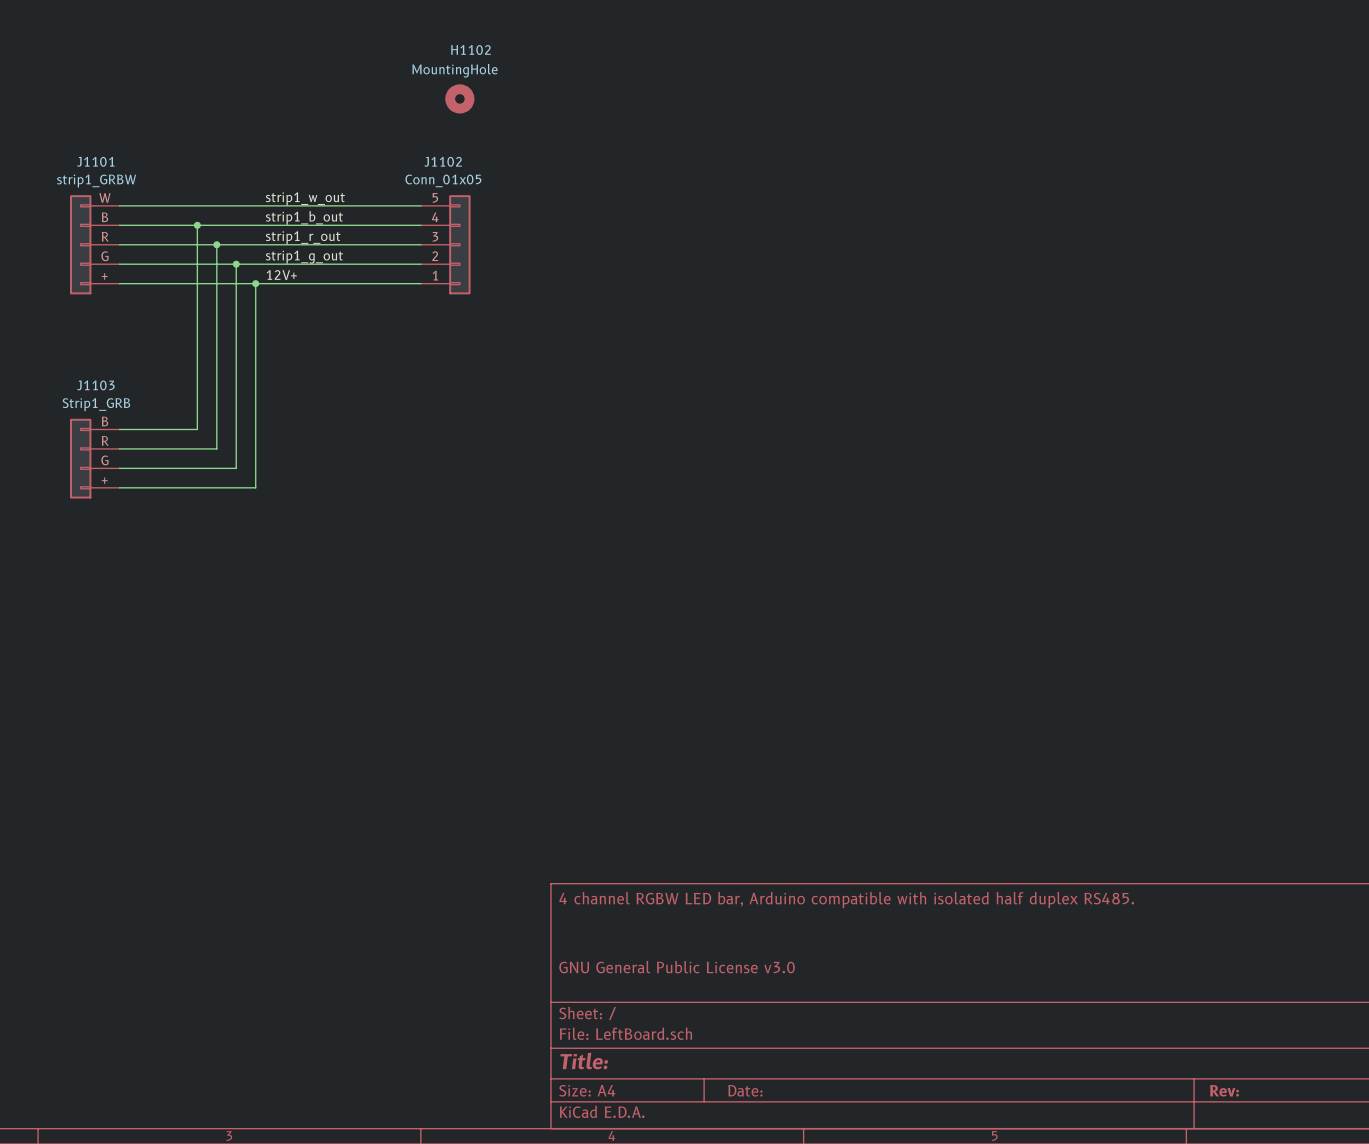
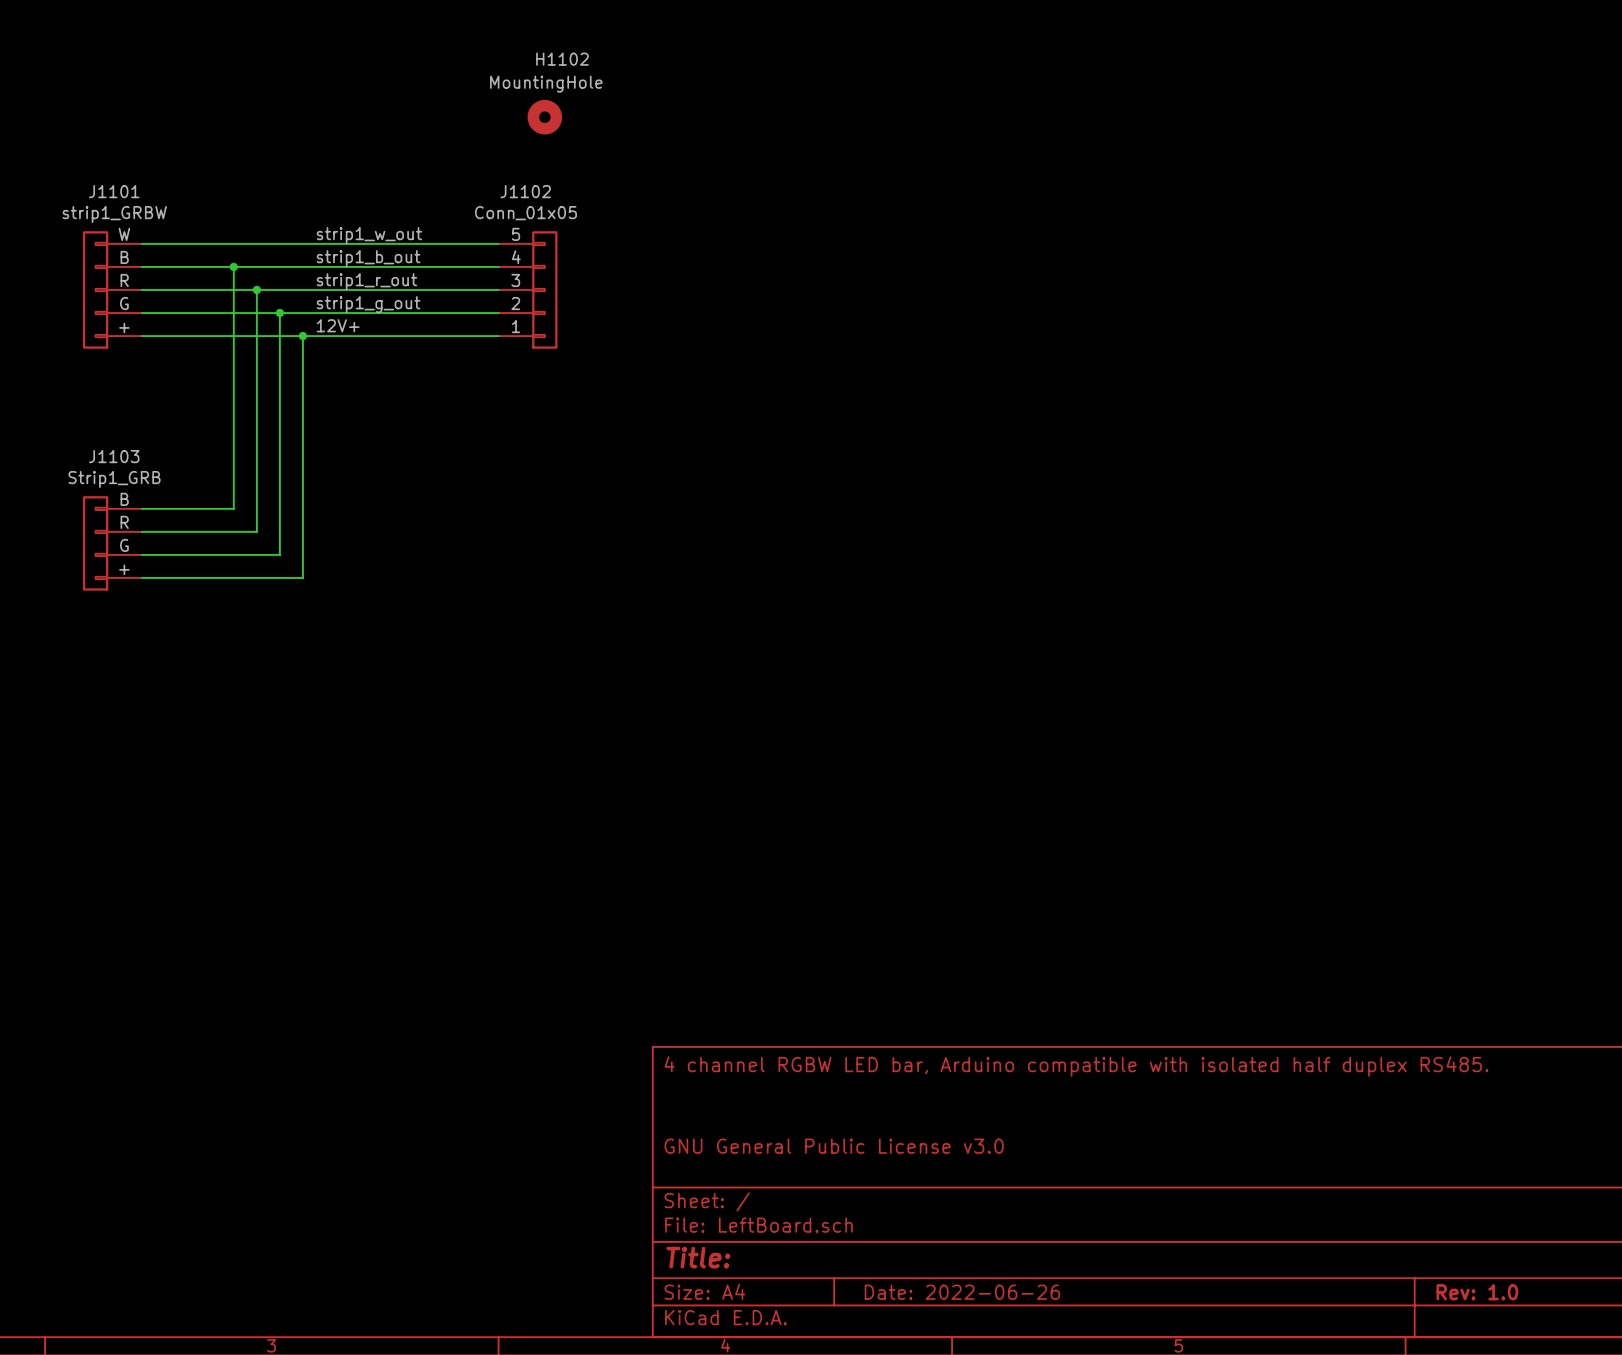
title block: Date: (745, 1090) -> Date: 2022-06-26 (962, 1292)
title block: Rev: (1224, 1090) -> Rev: 1.0 (1477, 1292)

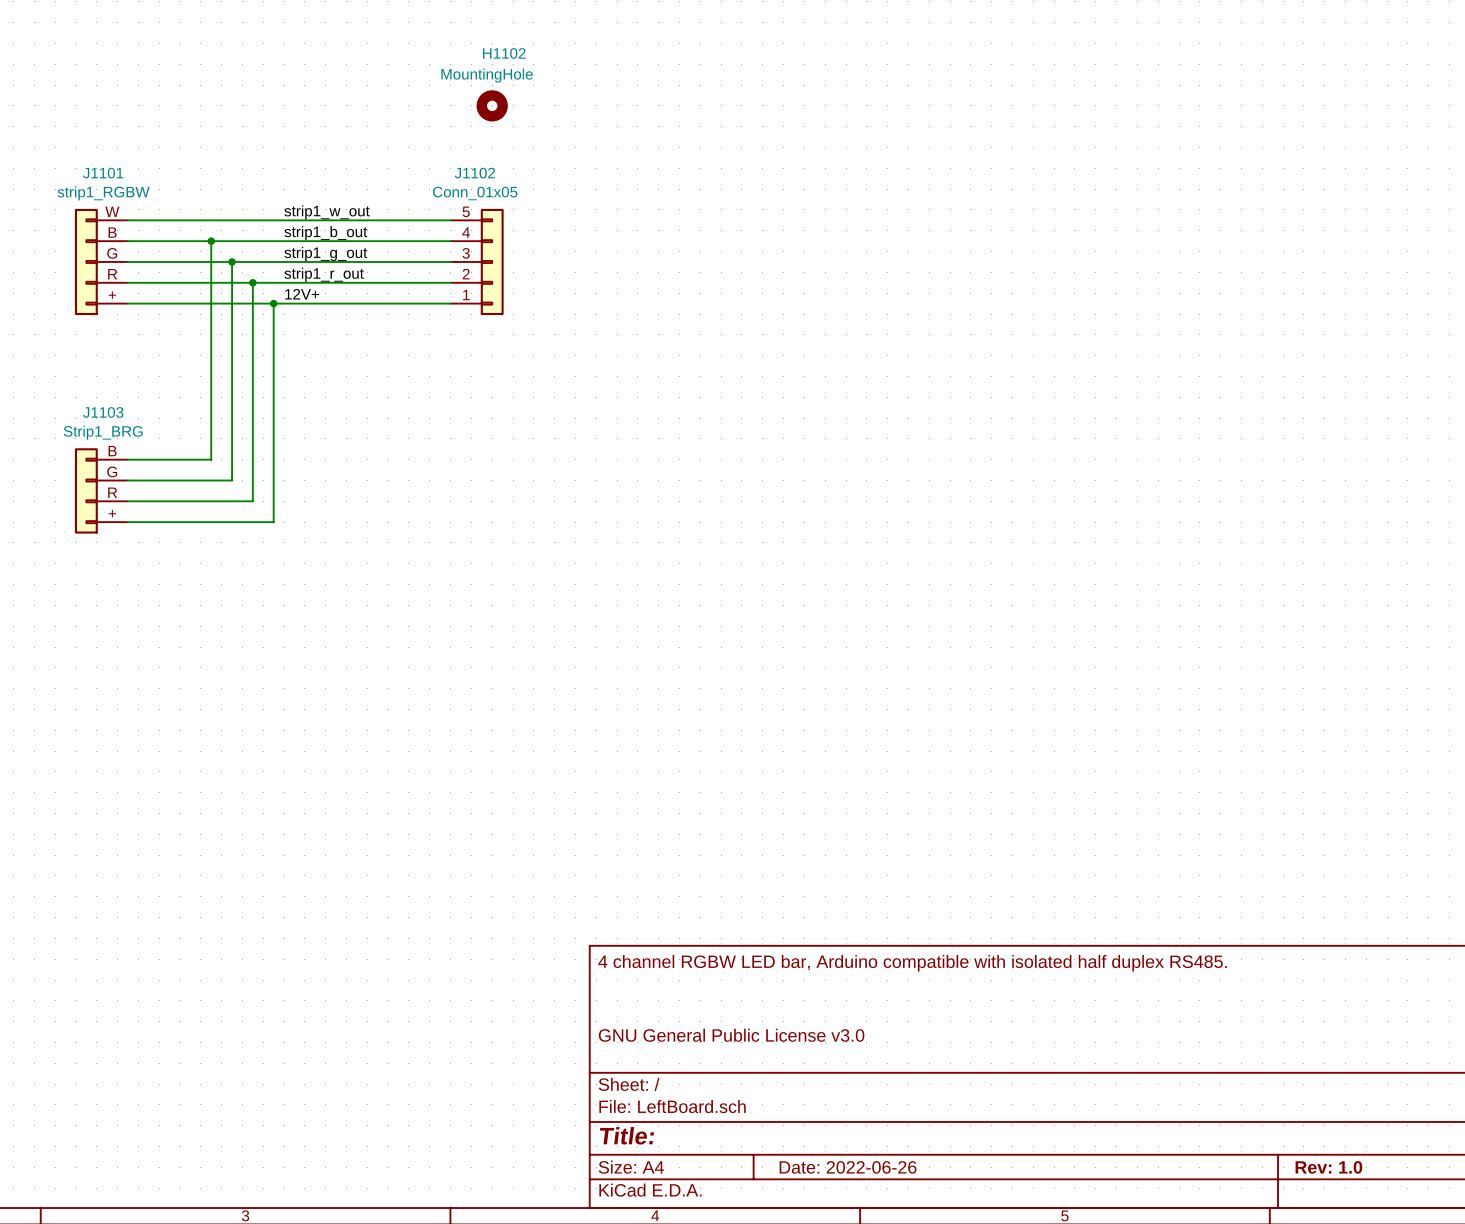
J1101 value: strip1_GRBW (114, 214) -> strip1_RGBW (103, 193)
J1101 pin number: R (124, 280) -> G (112, 253)
label: strip1_r_out (366, 281) -> strip1_g_out (325, 253)
J1101 pin number: G (124, 303) -> R (112, 274)
label: strip1_g_out (368, 304) -> strip1_r_out (324, 274)
J1103 value: Strip1_GRB (114, 479) -> Strip1_BRG (103, 432)
J1103 pin number: R (124, 522) -> G (112, 471)
J1103 pin number: G (124, 545) -> R (112, 492)

